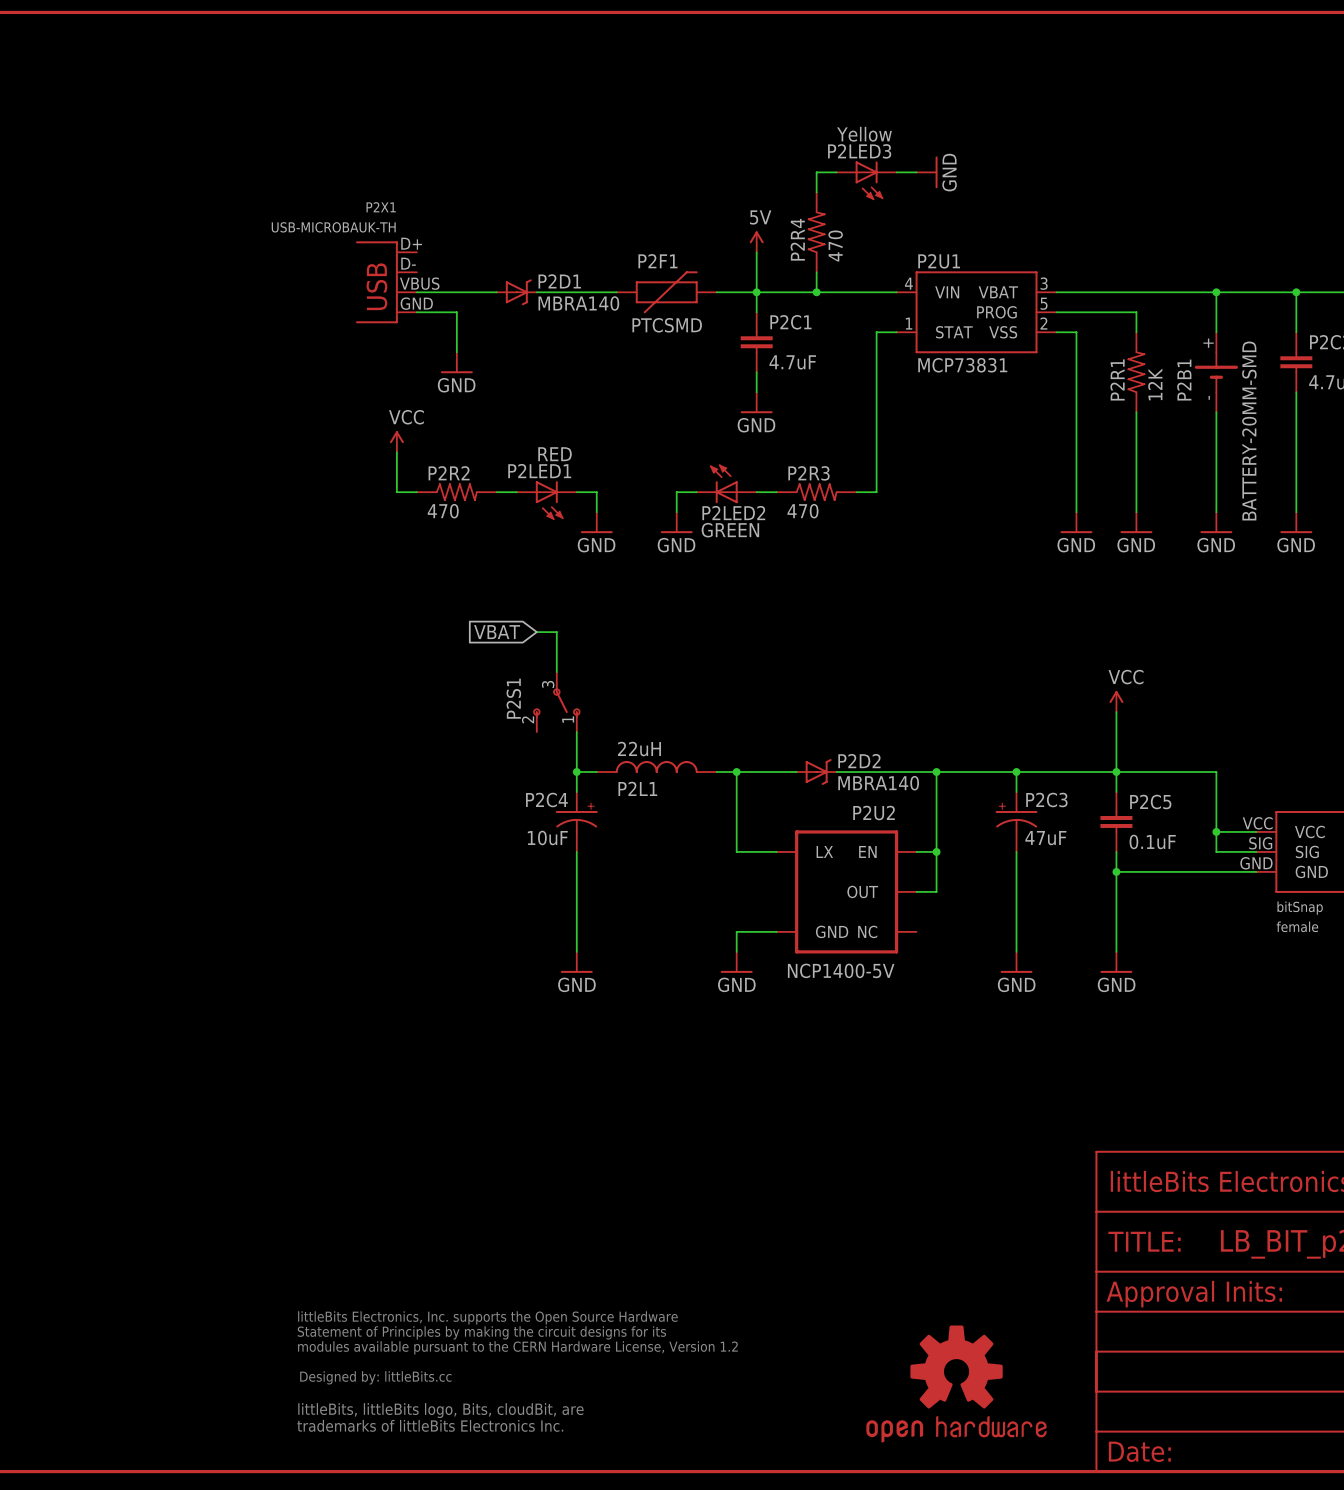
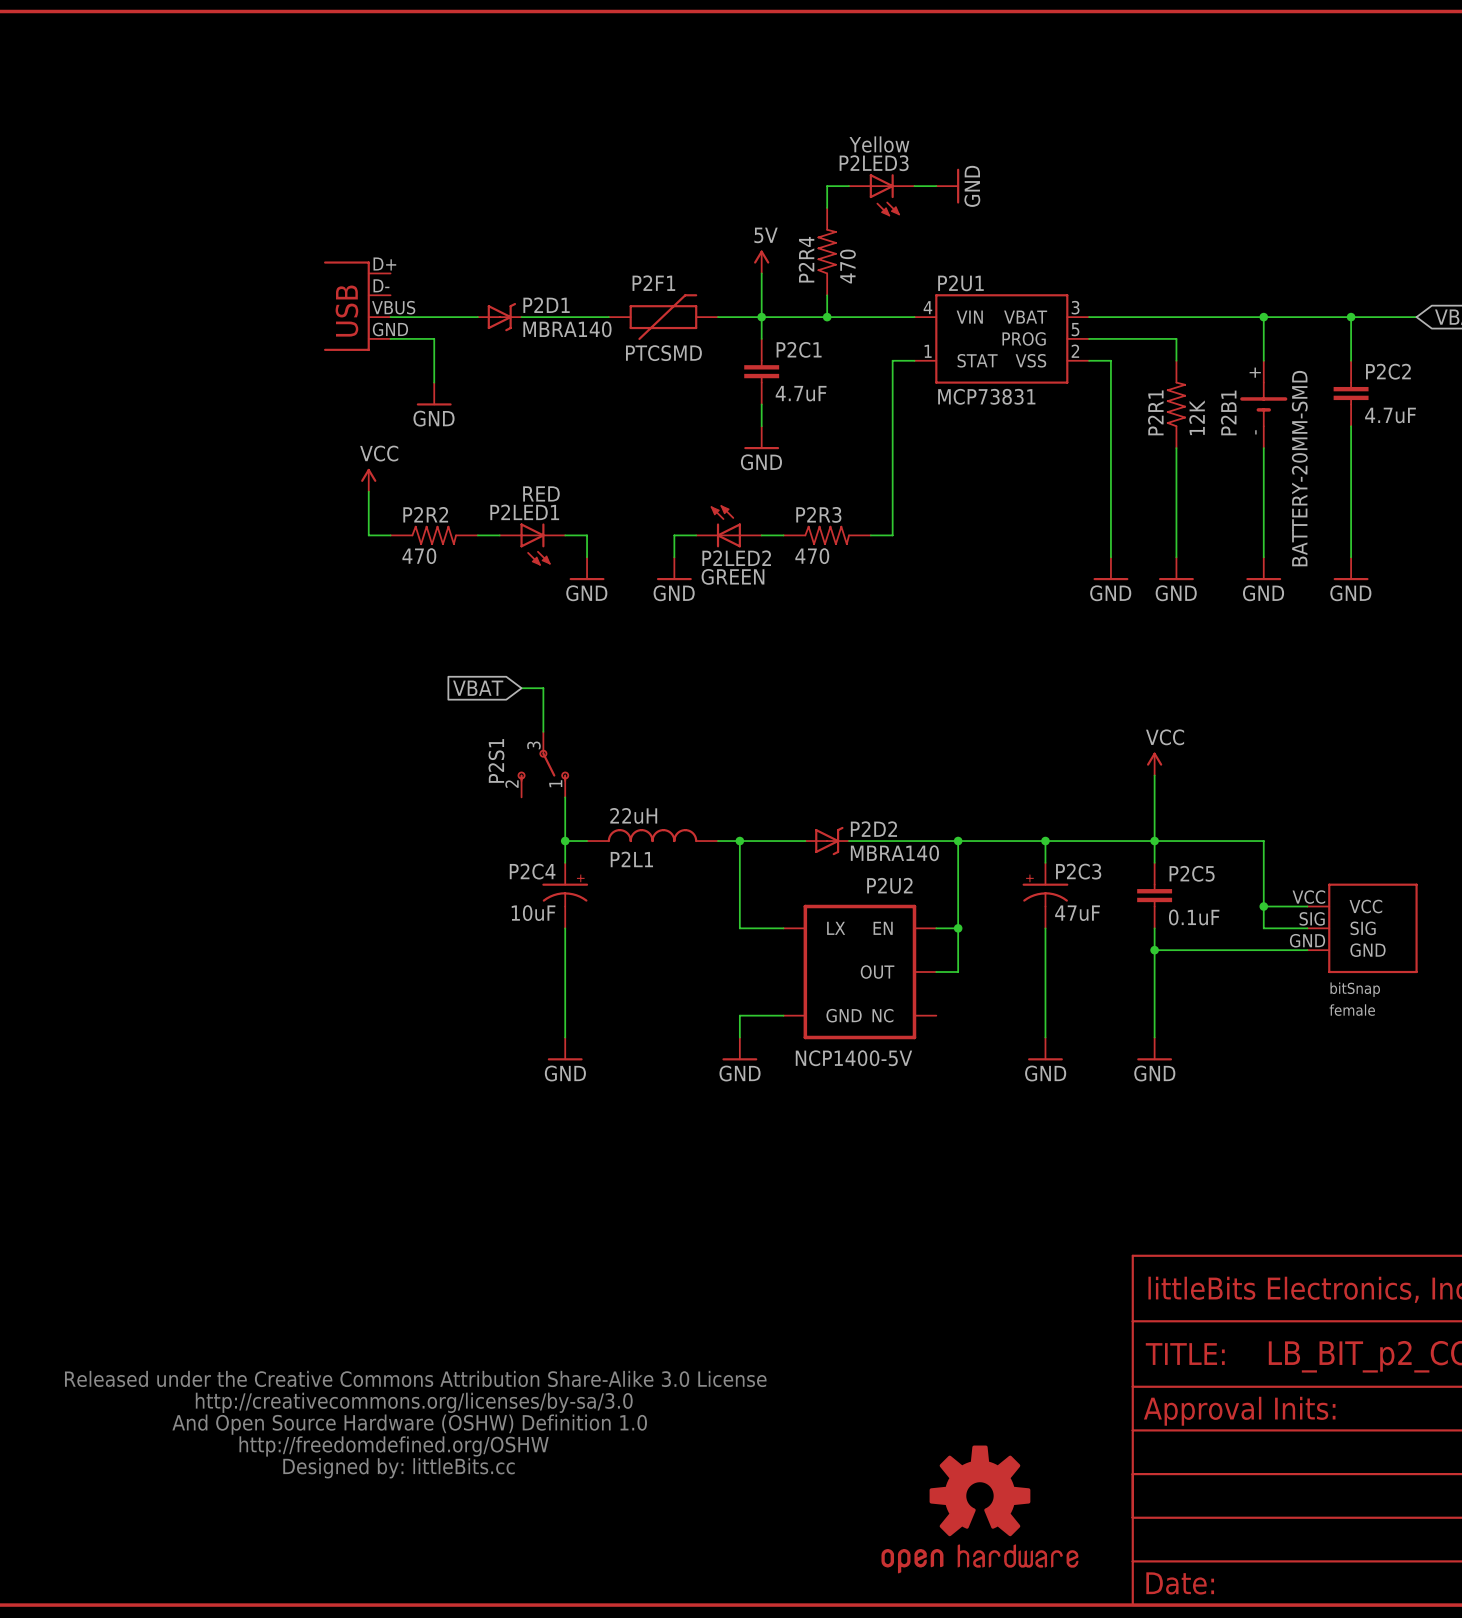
P2X1 name: P2X1 (381, 207) -> none
P2X1 value: USB-MICROBAUK-TH (333, 227) -> none
part: none -> (415, 1424)
part: (517, 1371) -> none

